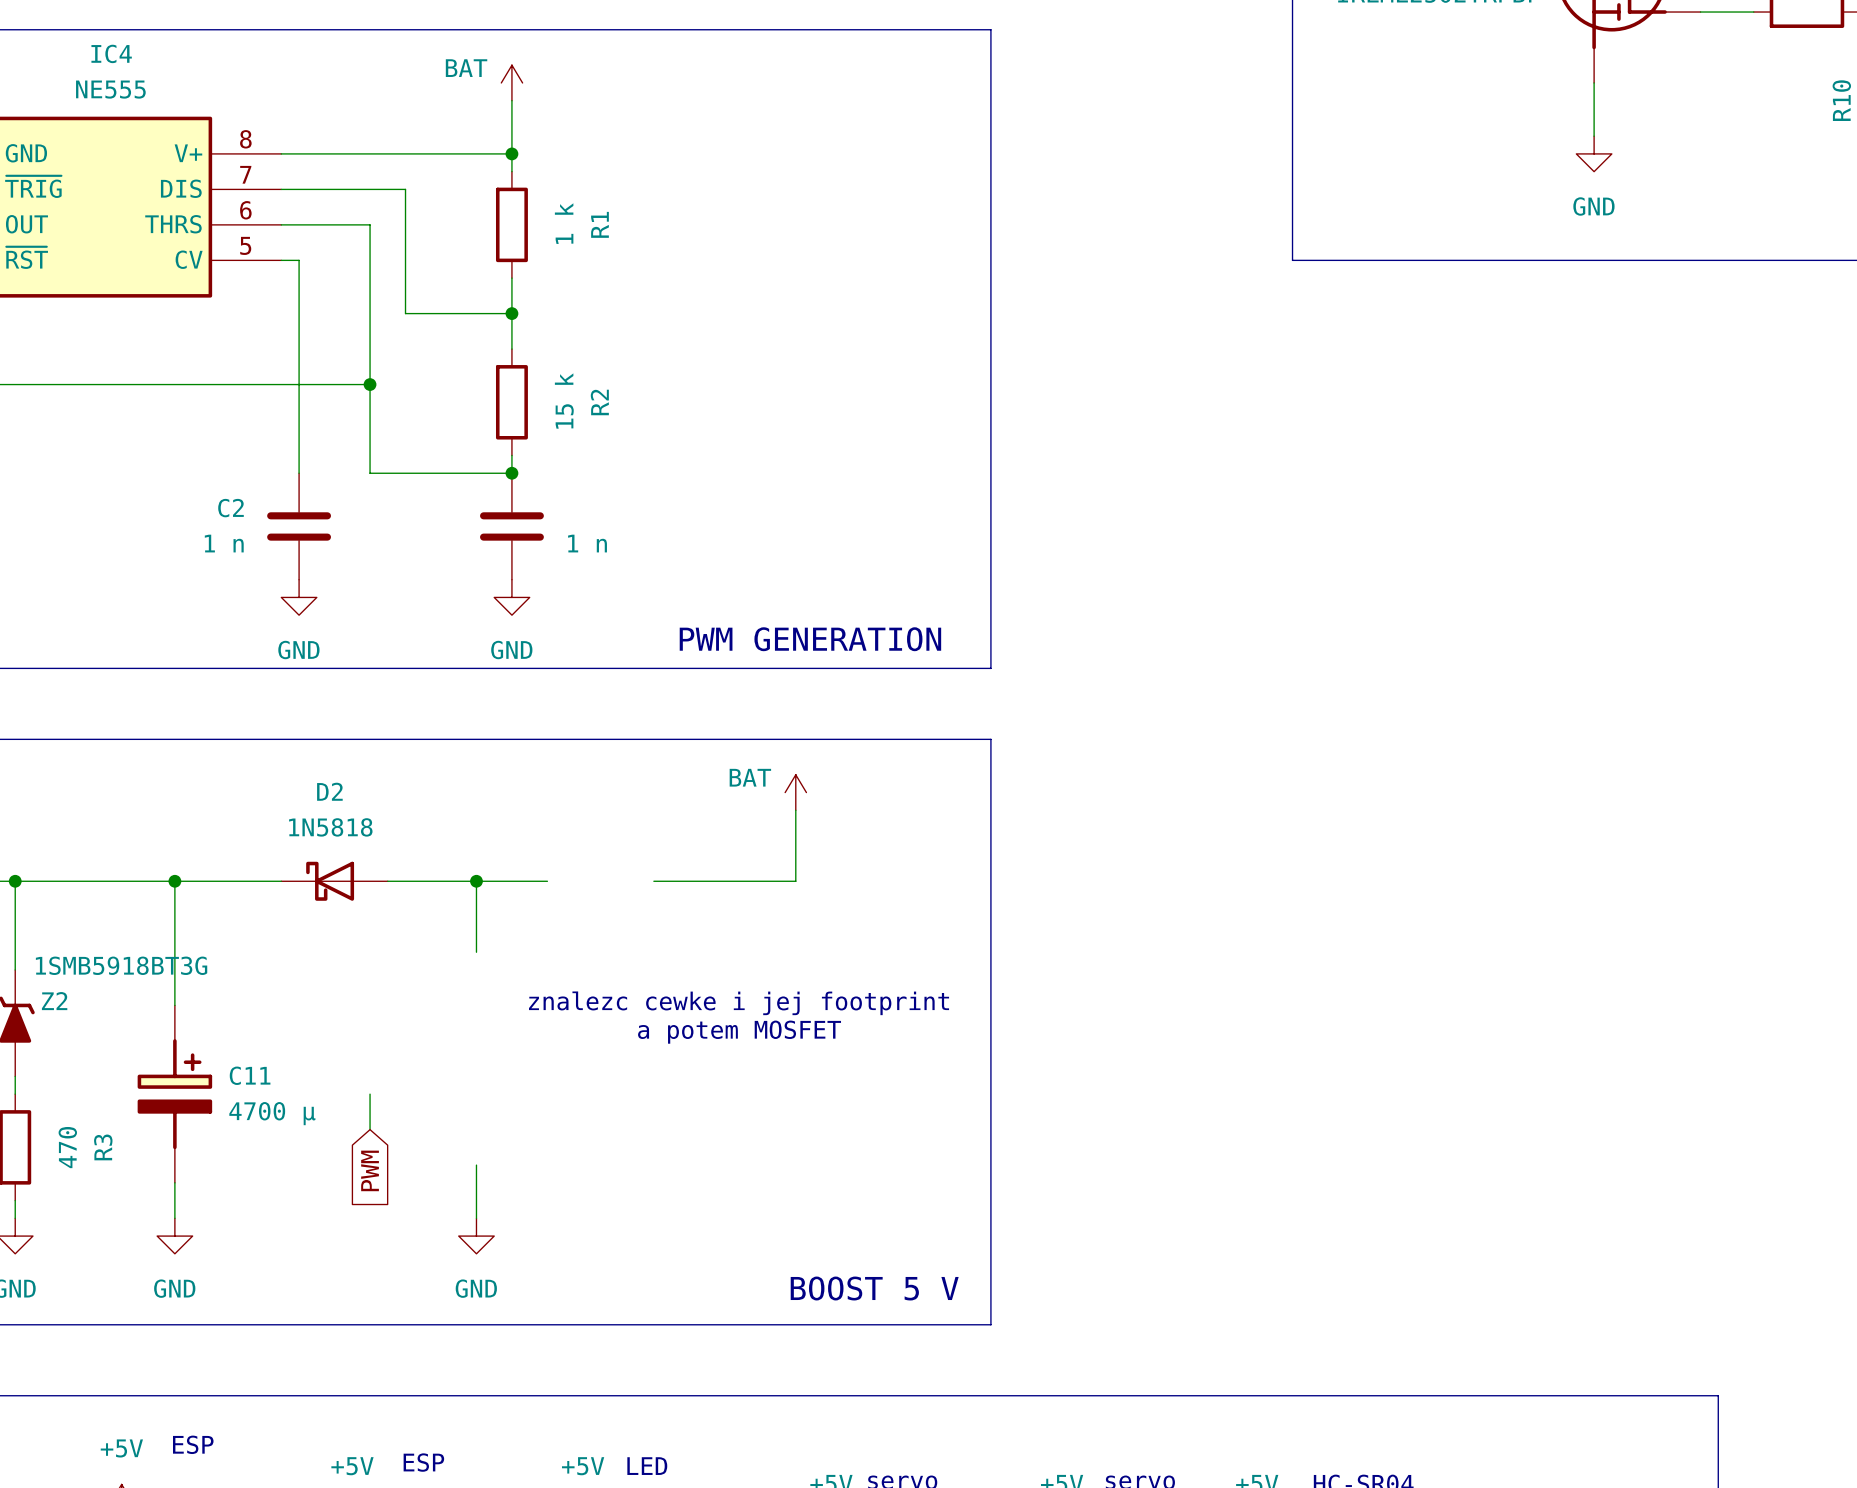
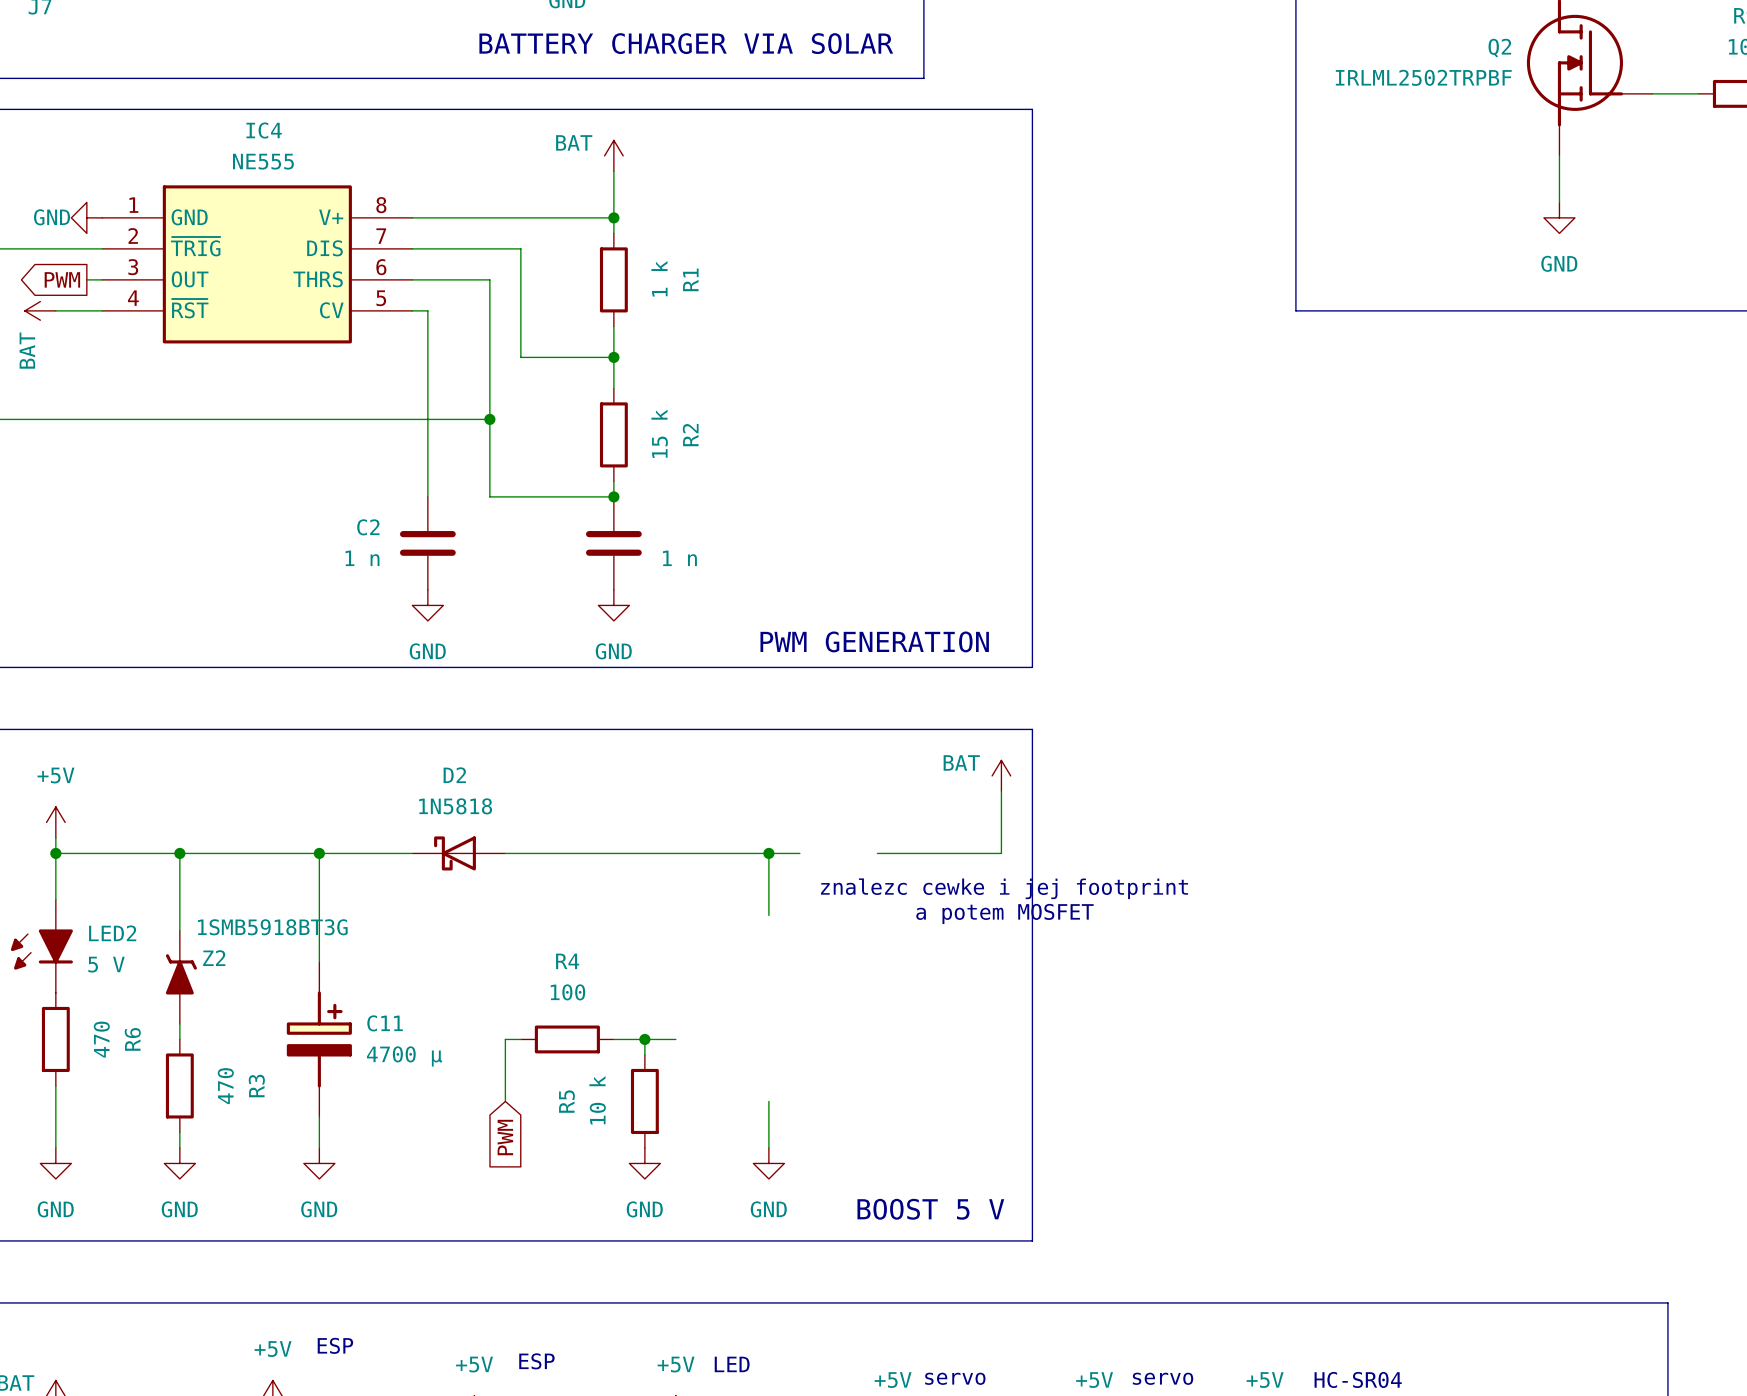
power symbol position: BAT (795, 792) -> BAT (1001, 775)
wire: (795, 810) (795, 881) (724, 881) -> none
wire: none -> (1001, 791) (1001, 853) (877, 853)
wire: (476, 881) (476, 952) -> (768, 853) (768, 915)
junction: (476, 881) -> none
wire: none -> (644, 853) (737, 853)
junction: none -> (768, 853)
text position: znalezc cewke i jej footprint (739, 1003) -> znalezc cewke i jej footprint (1004, 888)
text position: a potem MOSFET (739, 1032) -> a potem MOSFET (1004, 913)
wire: (370, 1094) (370, 1129) -> none
wire: none -> (520, 1039) (505, 1039) (505, 1101)
R4: none -> 100 (567, 1039)
wire: none -> (613, 1039) (675, 1039)
wire: none -> (644, 1039) (644, 1054)
junction: none -> (644, 1039)
wire: (476, 1165) (476, 1218) -> (768, 1101) (768, 1147)
R5: none -> 10 k (644, 1101)
global label position: PWM (370, 1170) -> PWM (505, 1137)
power symbol position: GND (476, 1236) -> GND (644, 1163)
power symbol: none -> GND (768, 1163)

